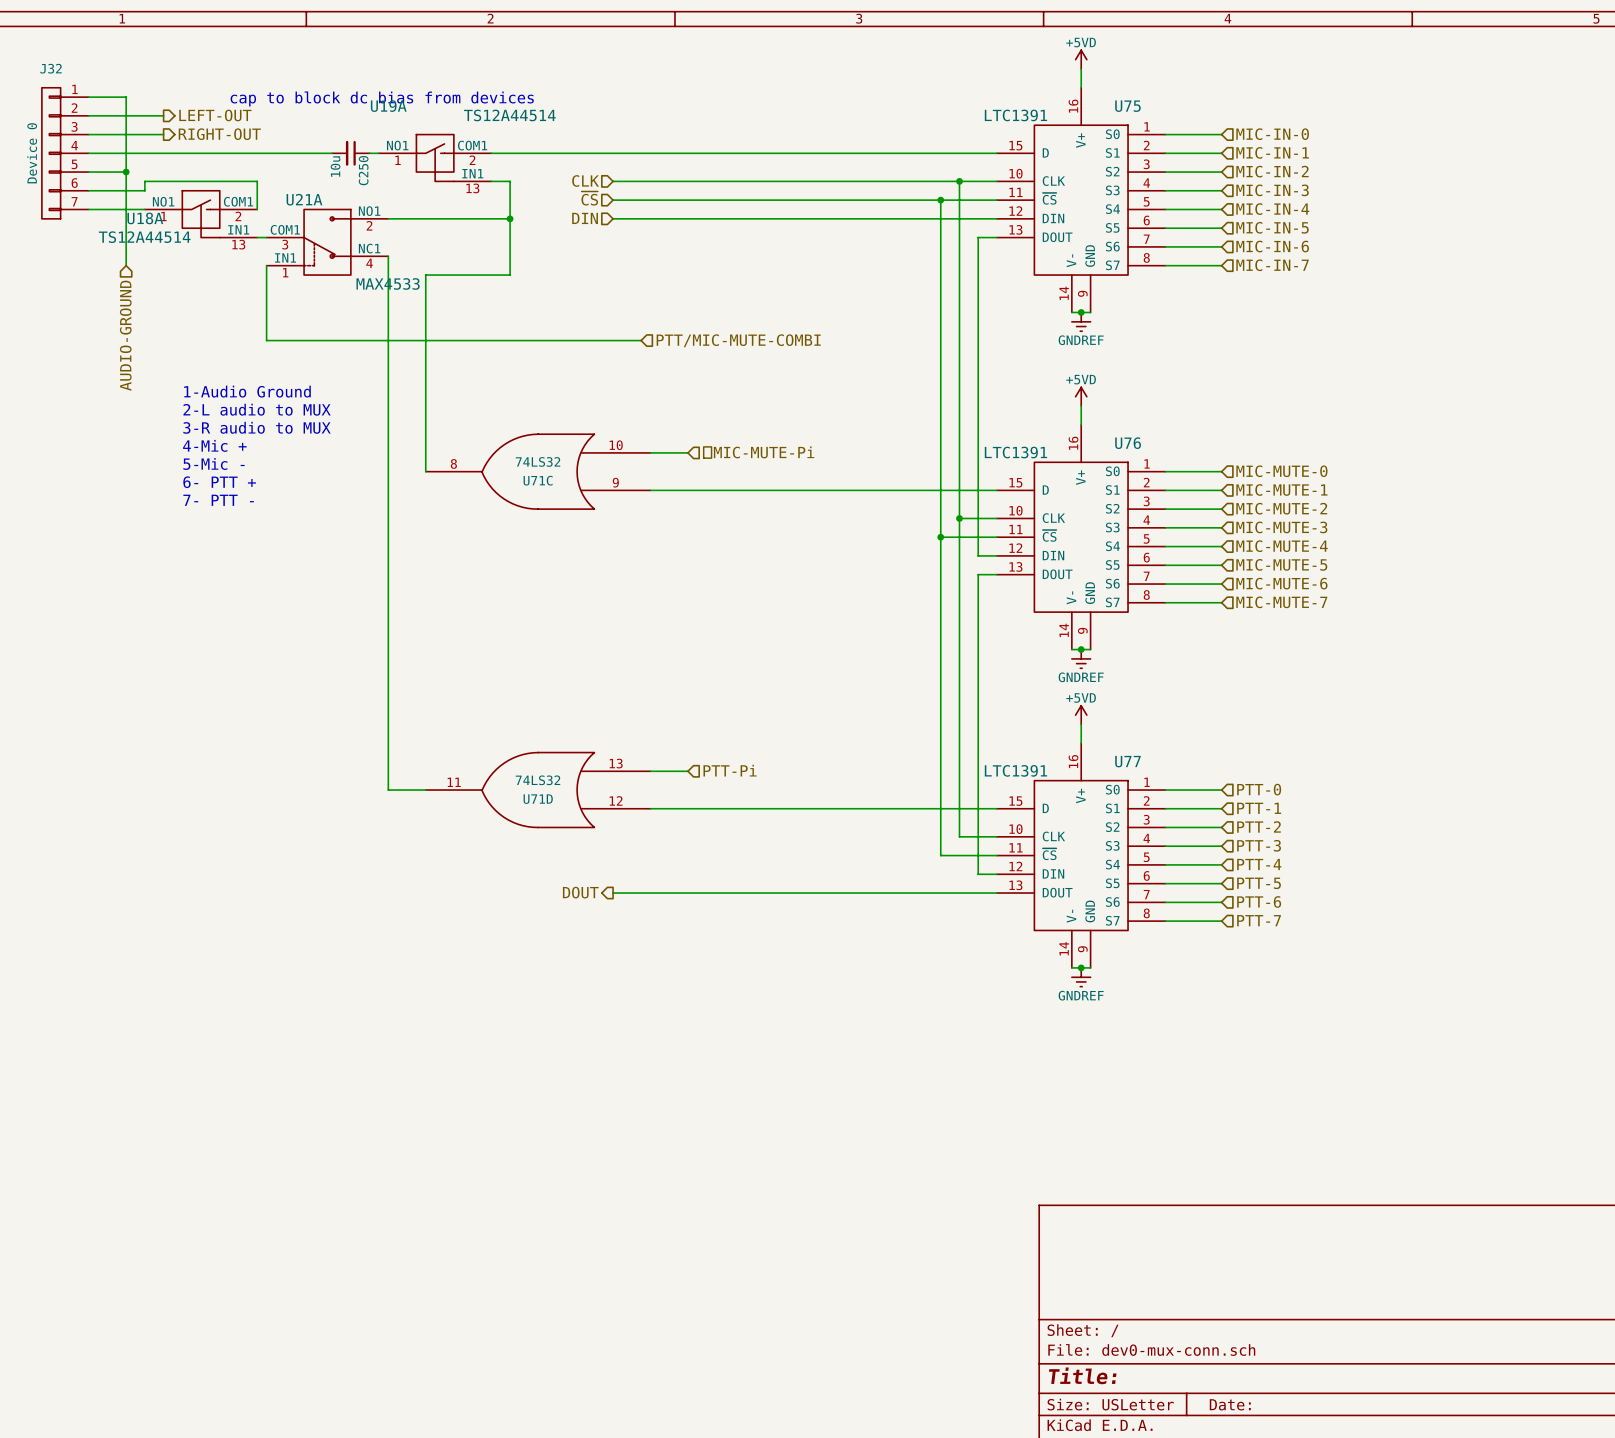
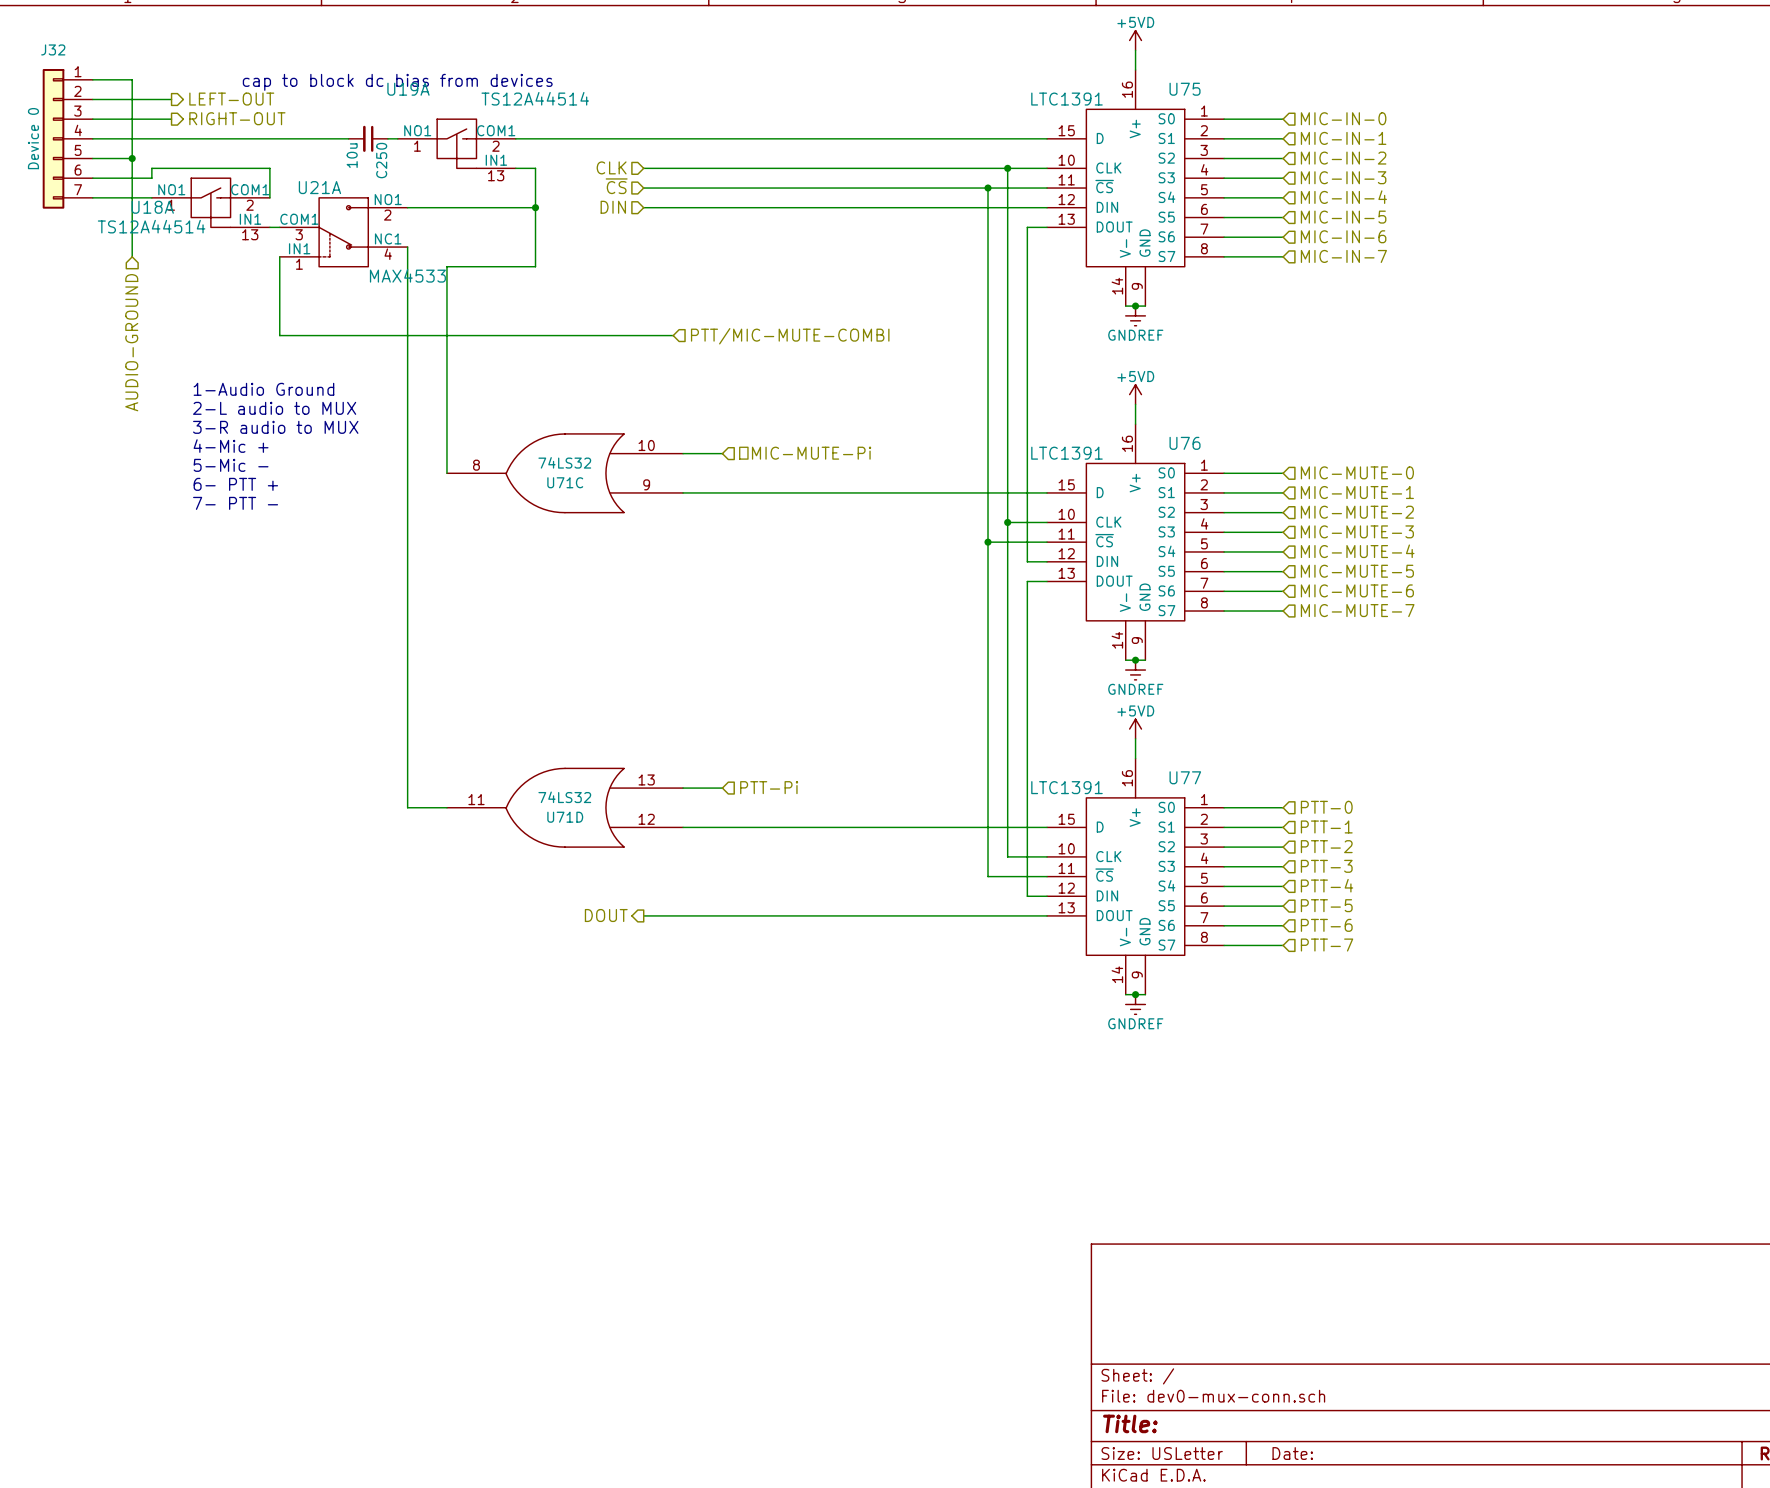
J32 symbol: [41, 87, 89, 219] -> [42, 69, 93, 209]

